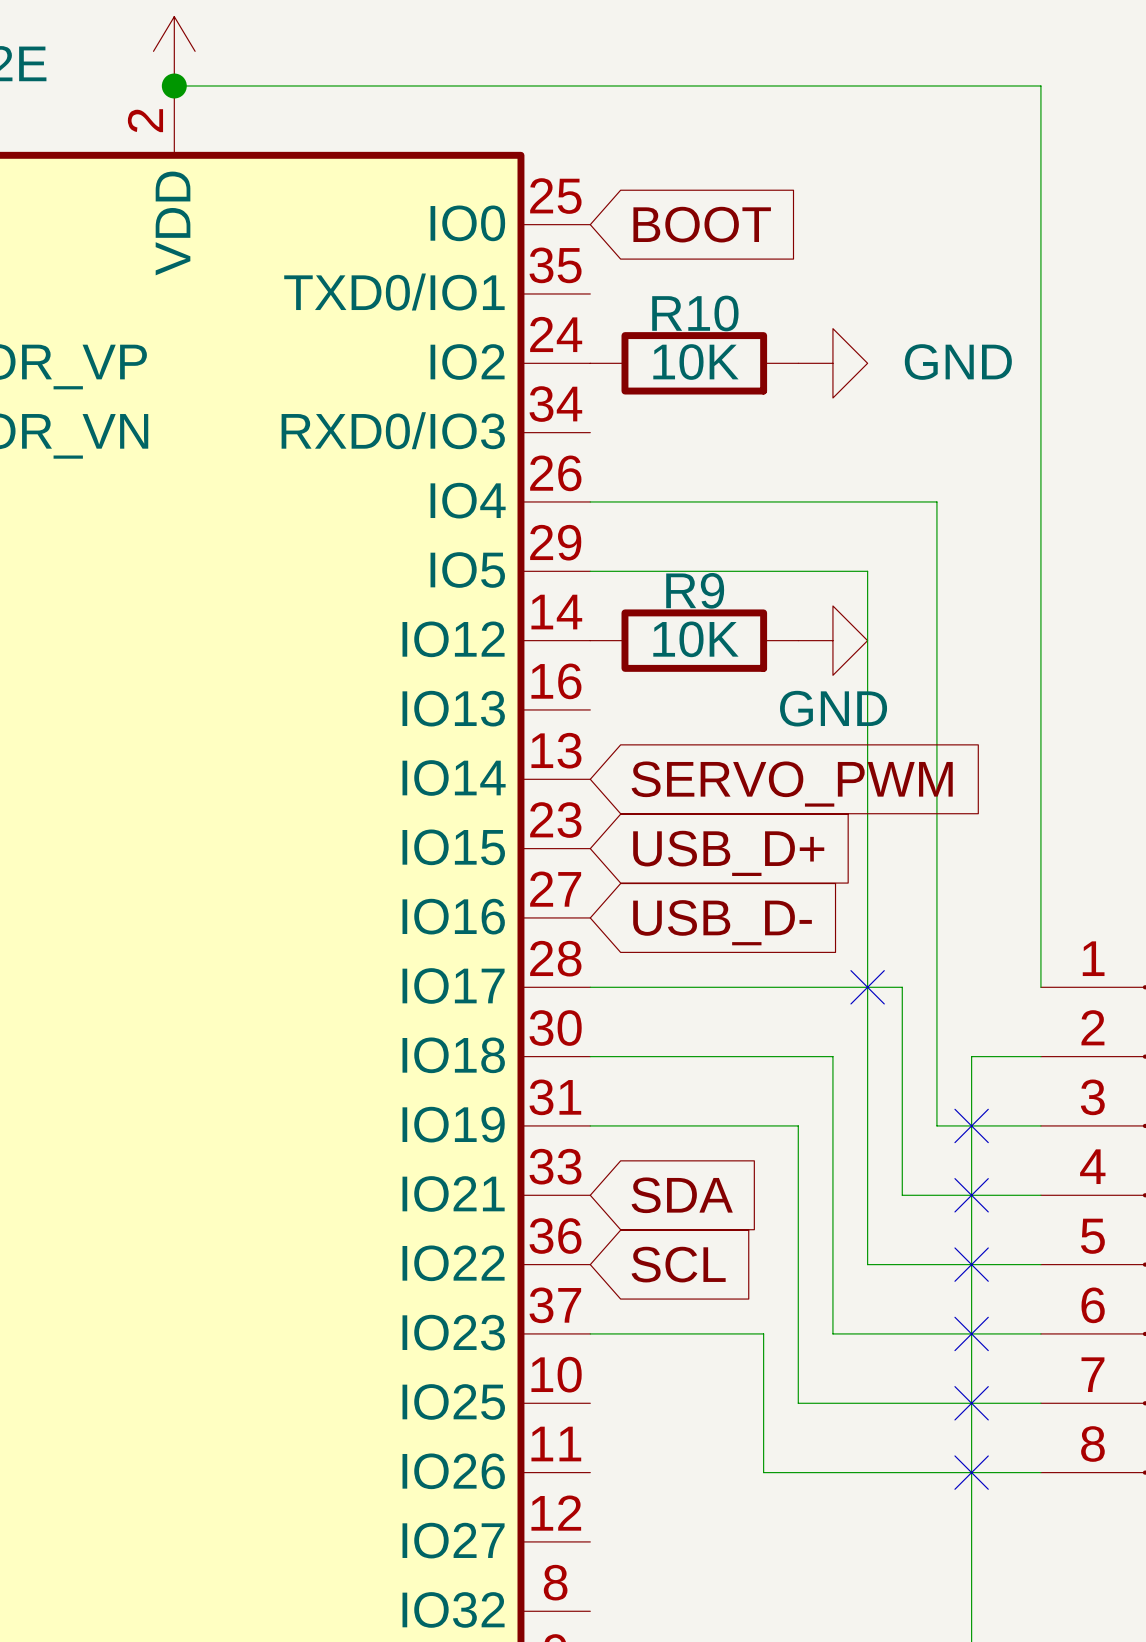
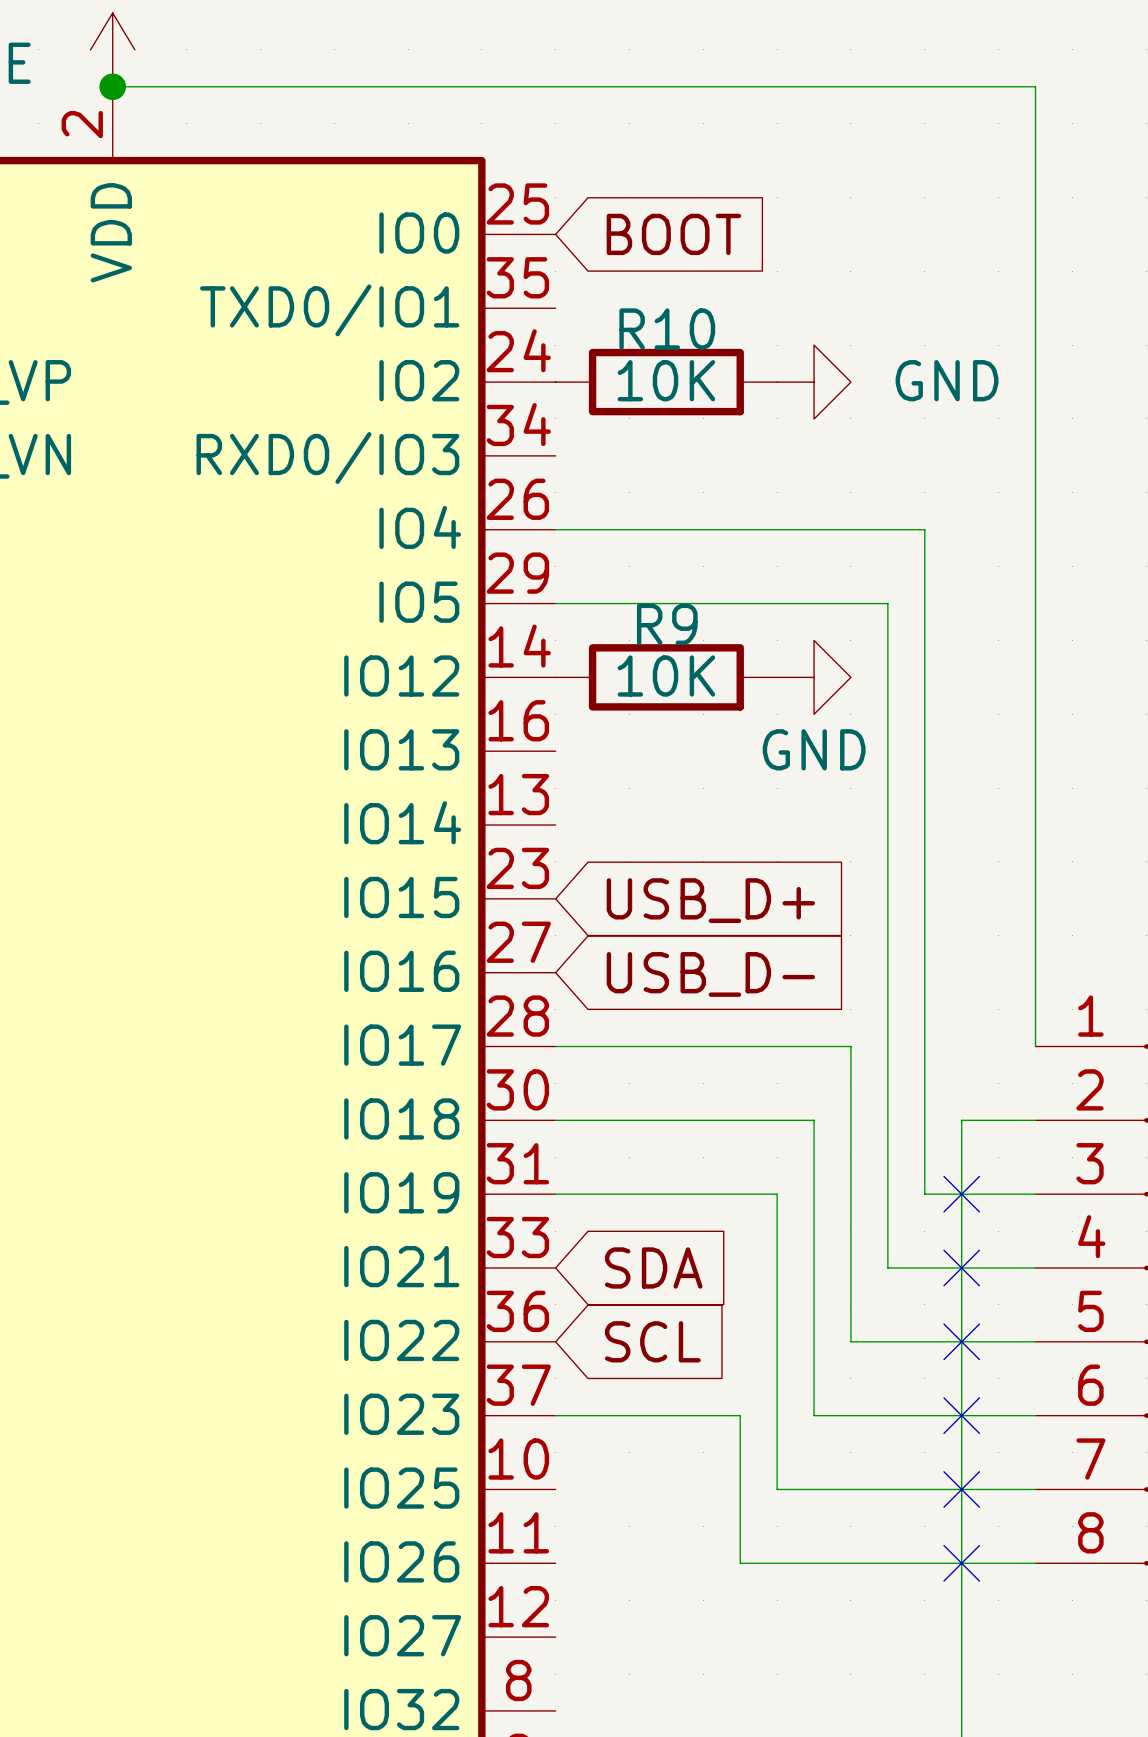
wire: (867, 571) (867, 987) (902, 987) -> (850, 603) (887, 603) (887, 1046)
global label: SERVO_PWM (792, 784) -> none
no-connect mark: (867, 987) -> none

